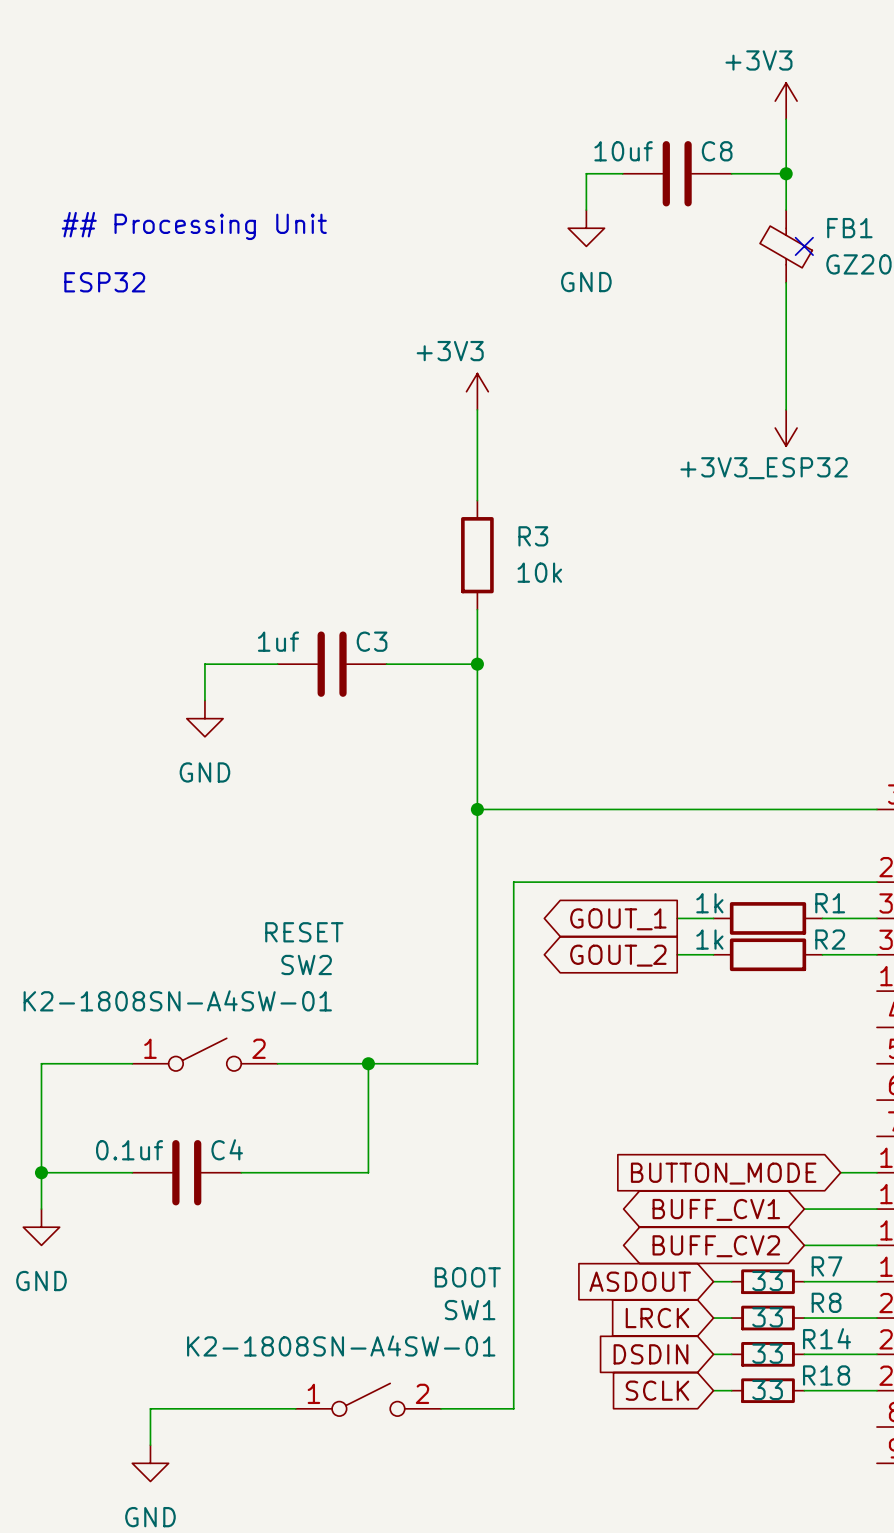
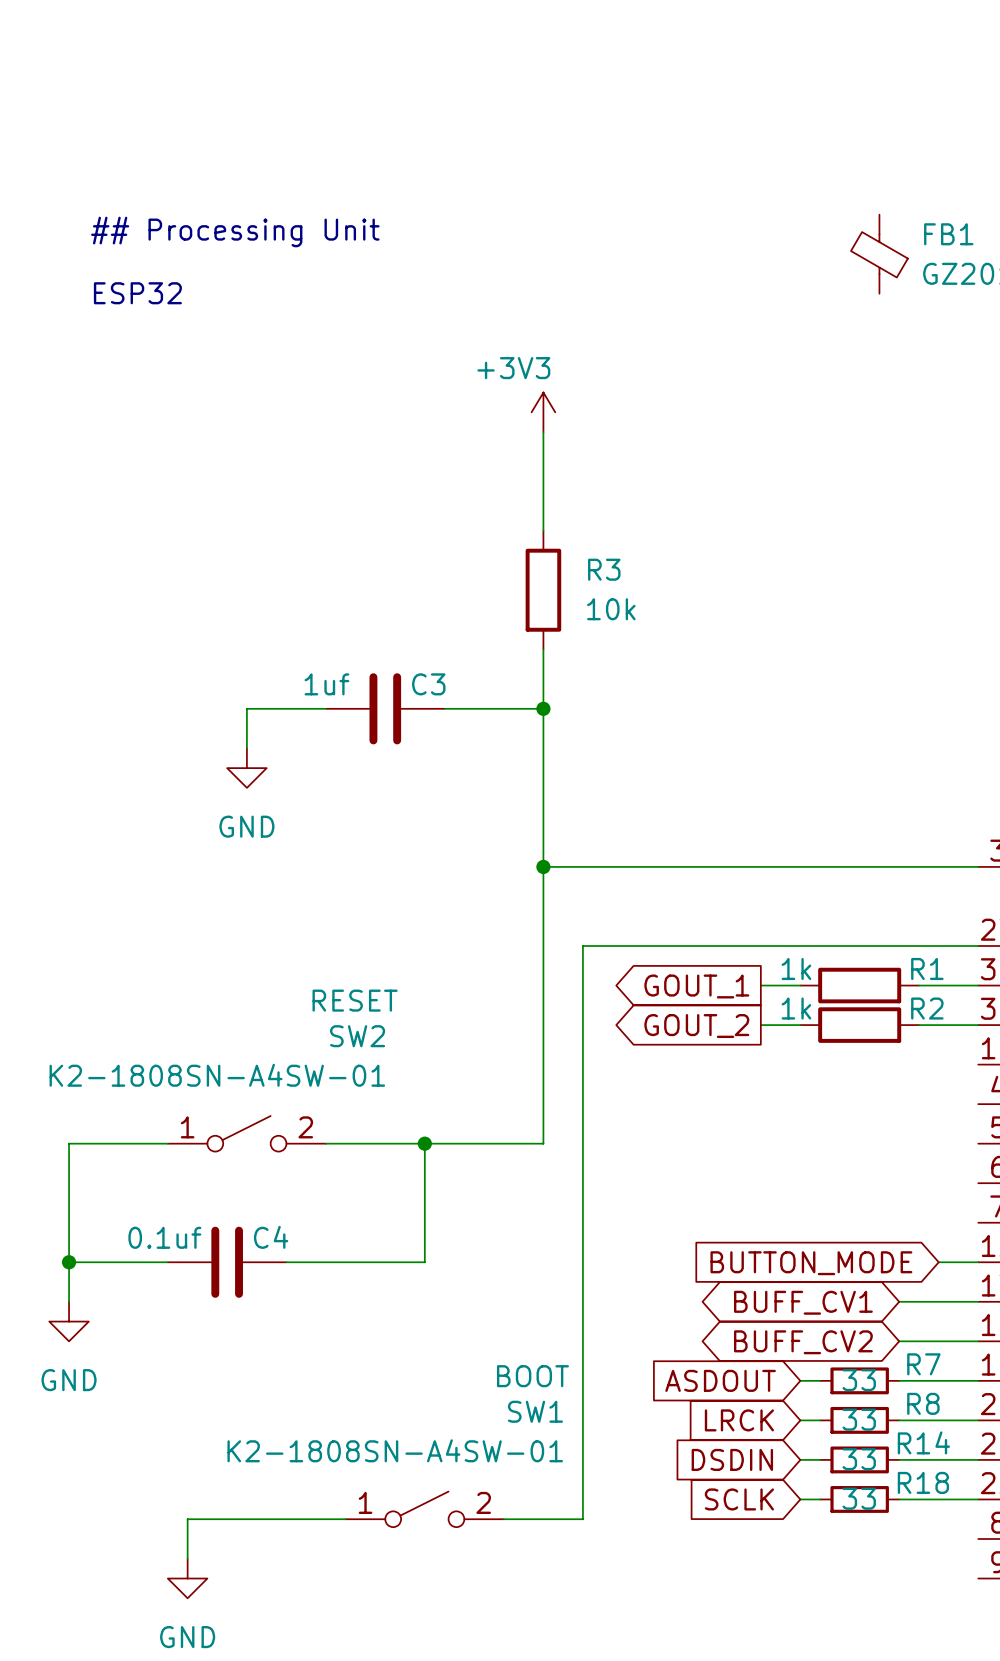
power symbol: +3V3 (786, 101) -> none
wire: (786, 119) (786, 210) -> none
wire: (622, 173) (586, 173) (586, 210) -> none
C8: 10uf (677, 173) -> none
wire: (731, 173) (786, 173) -> none
junction: (786, 173) -> none
power symbol: GND (586, 228) -> none
no-connect mark: (804, 246) -> none
wire: (786, 282) (786, 409) -> none
power symbol: +3V3_ESP32 (786, 428) -> none

